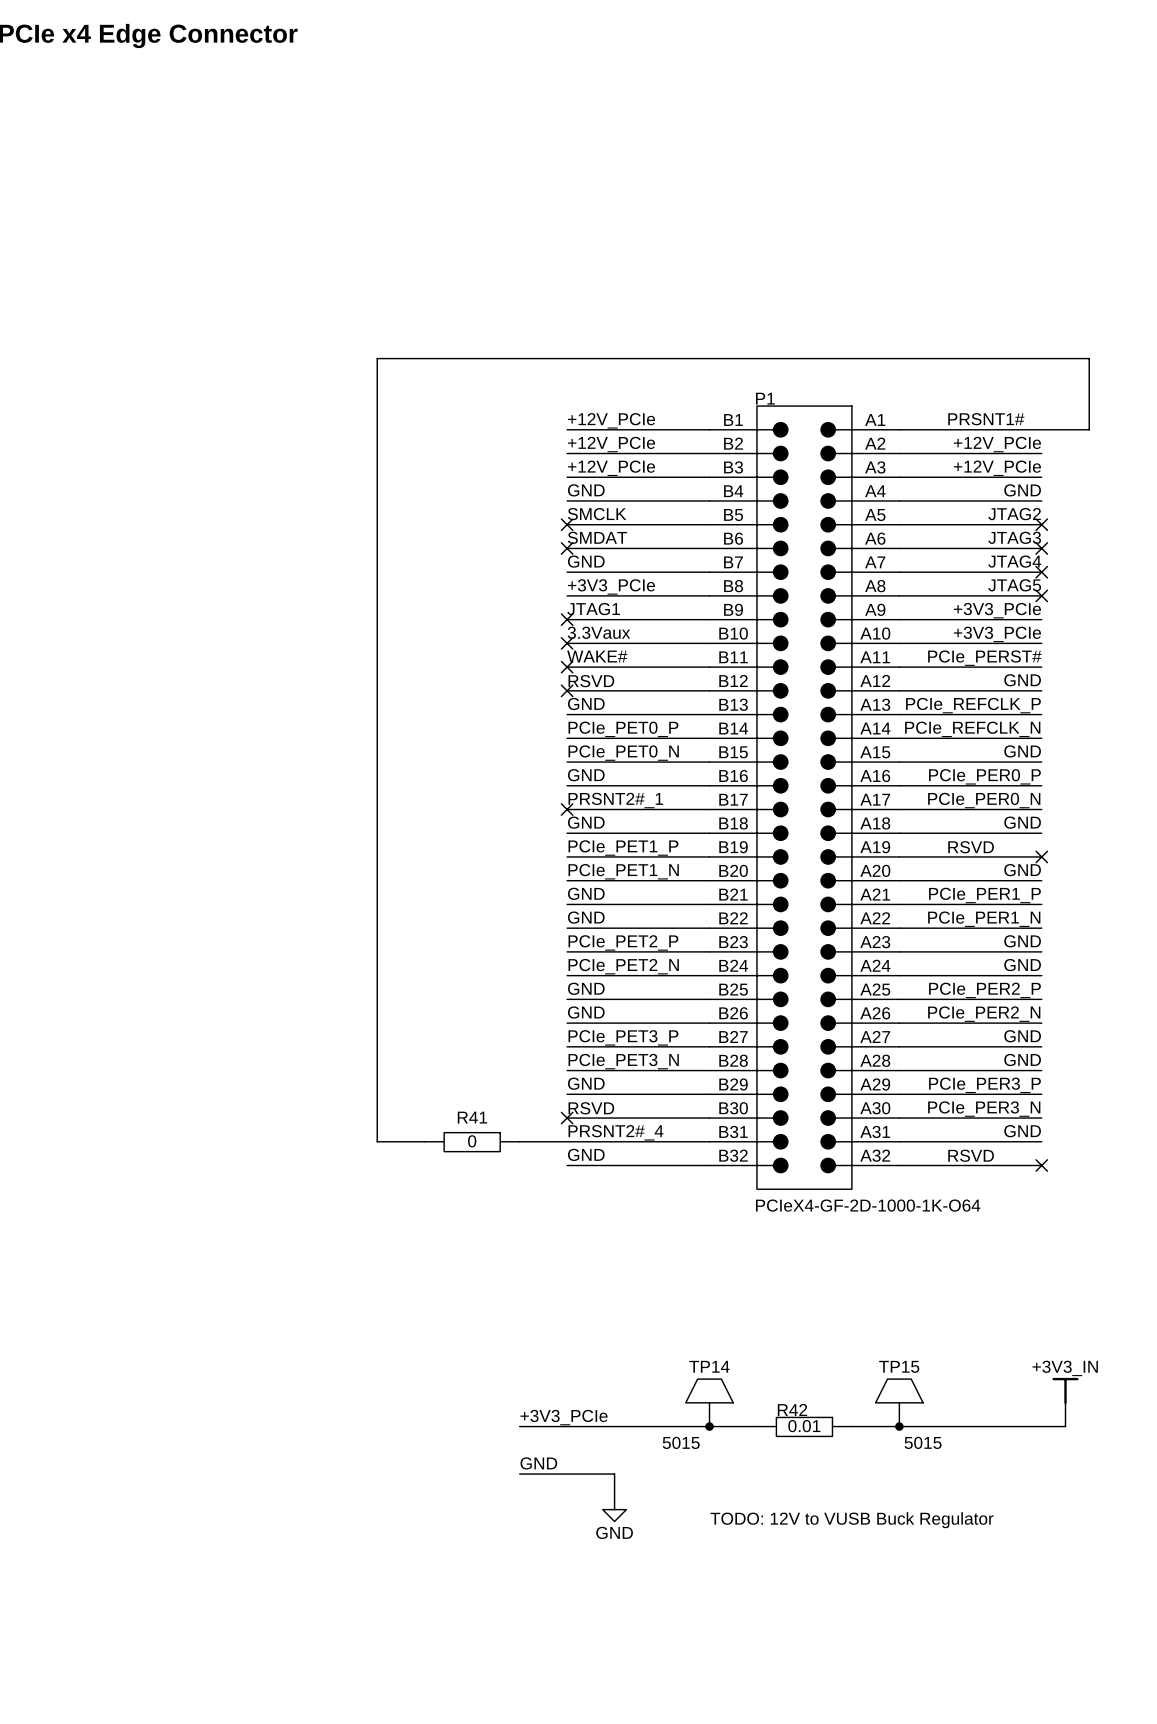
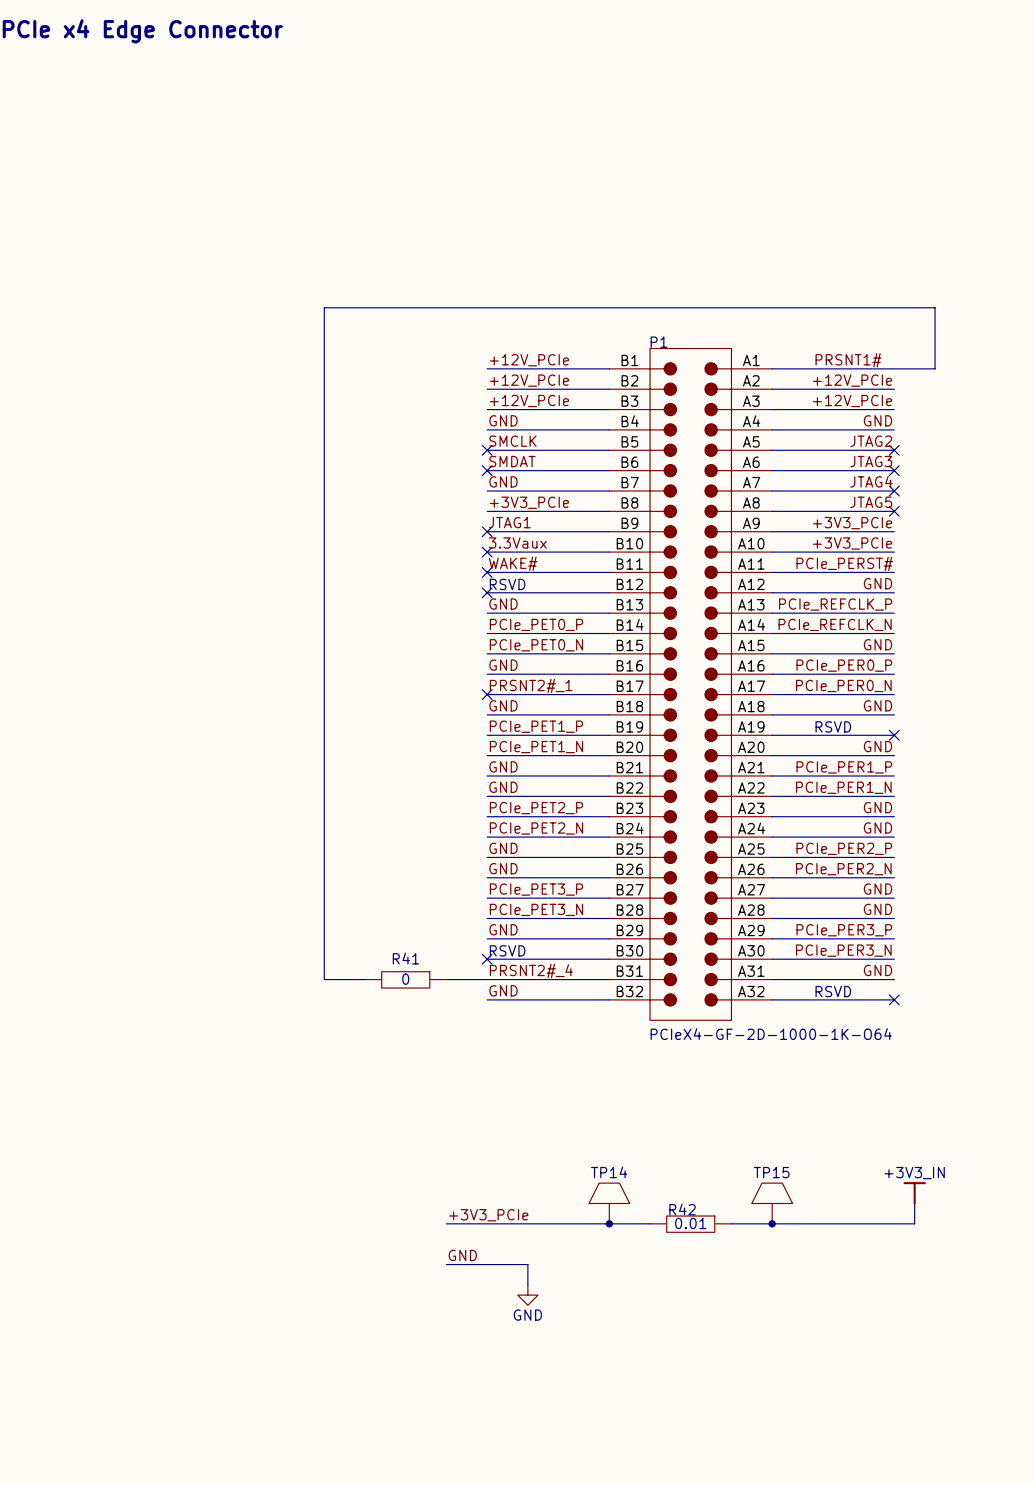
TP14 value: 5015 (681, 1442) -> none
TP15 value: 5015 (923, 1442) -> none
text: TODO: 12V to VUSB Buck Regulator (851, 1520) -> none

